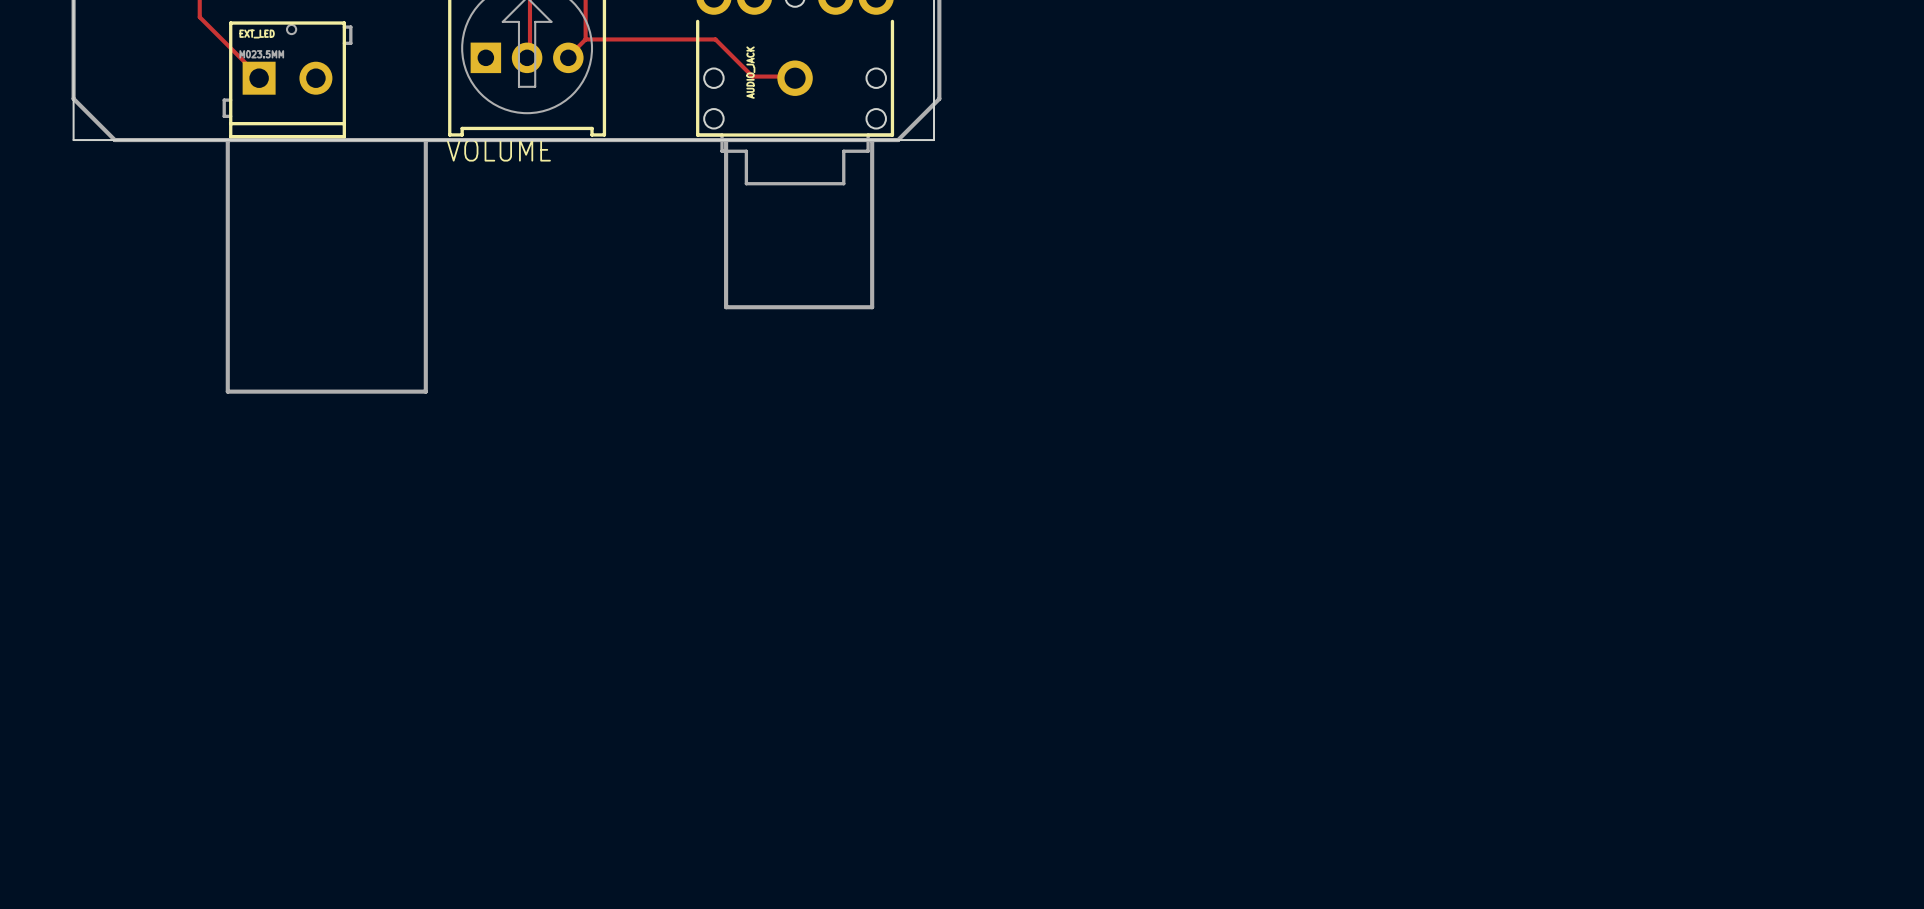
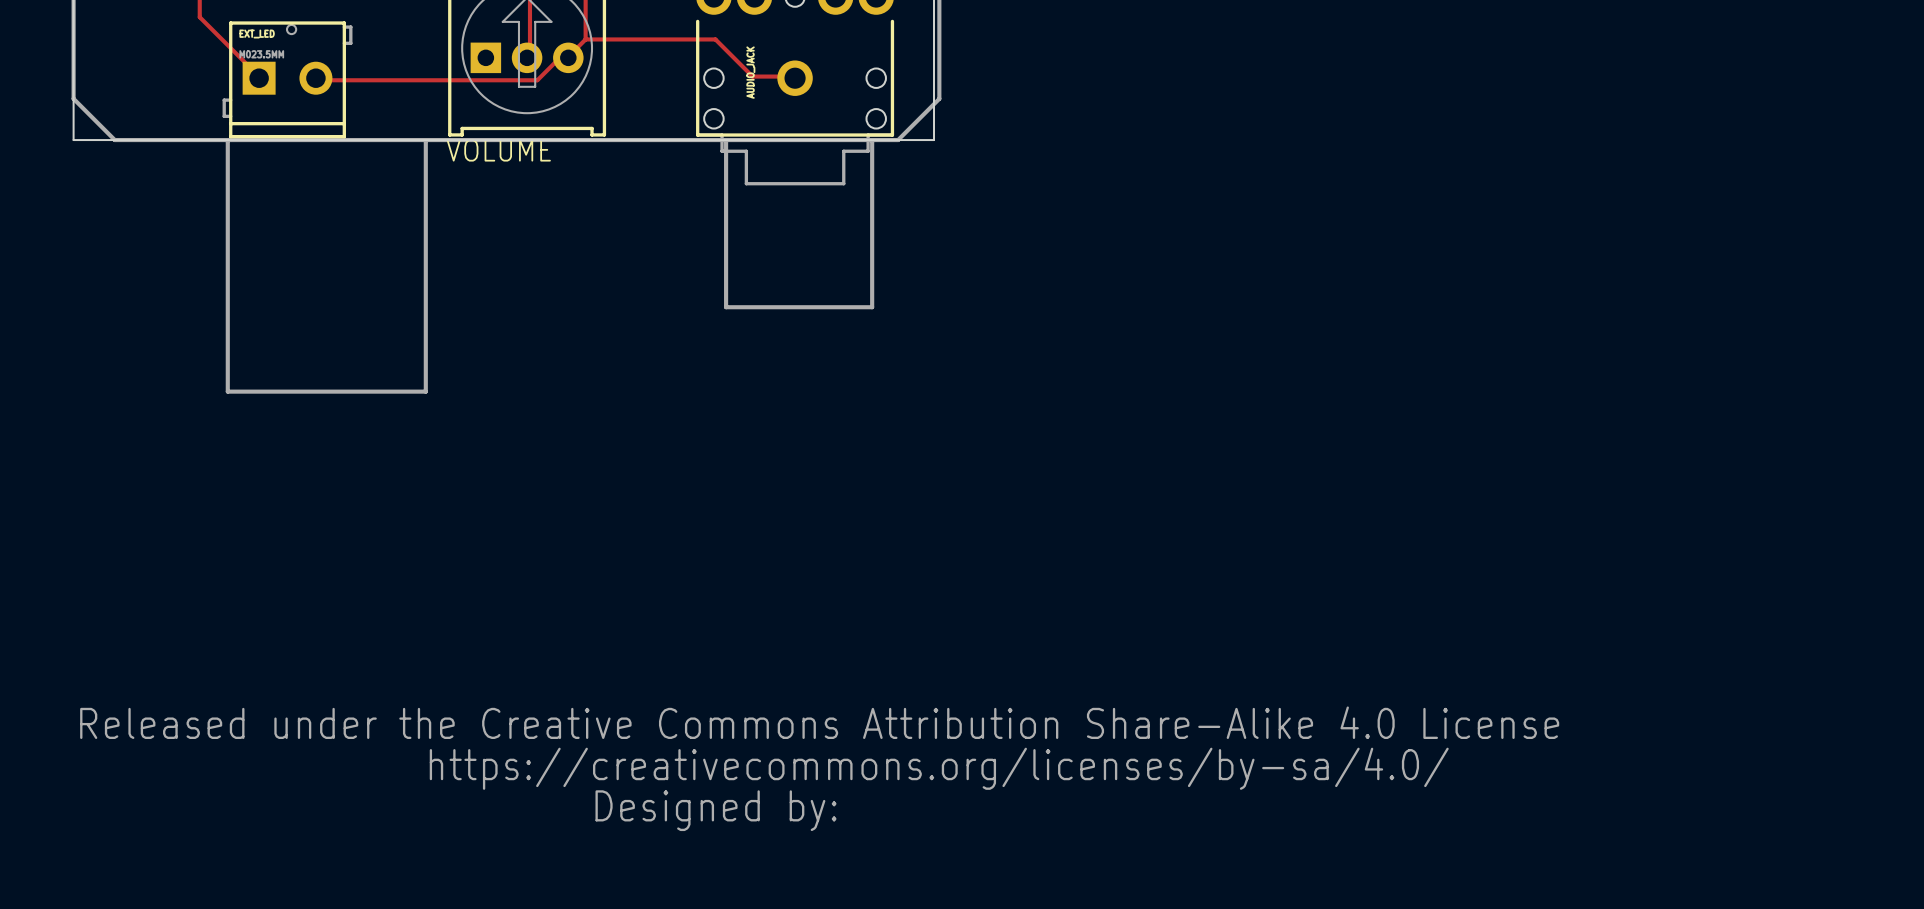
track: none -> (568, 57) (559, 58) (537, 80) (318, 80) (315, 78)
drawing: none -> [80, 706, 1560, 832]

